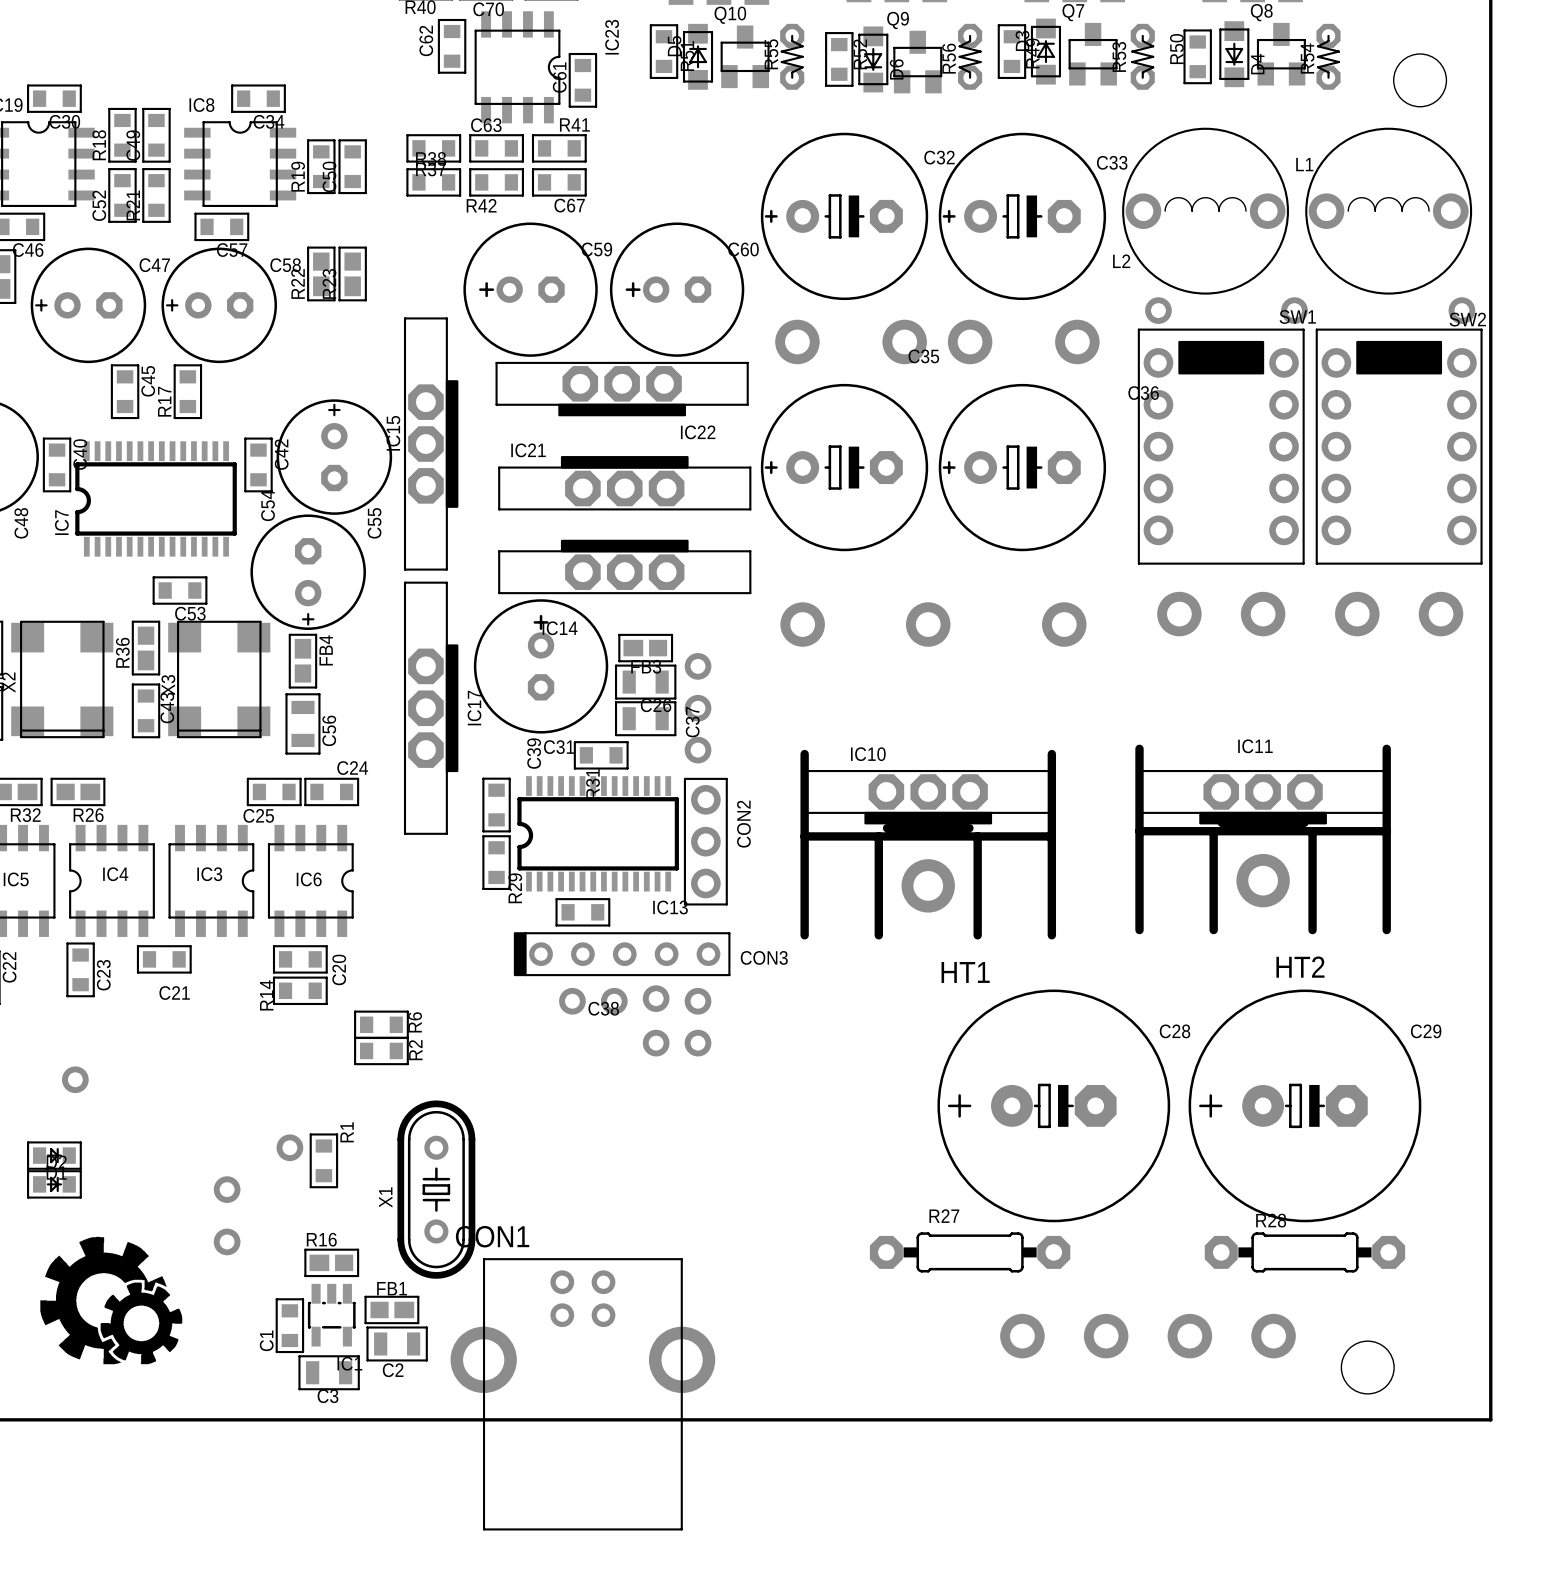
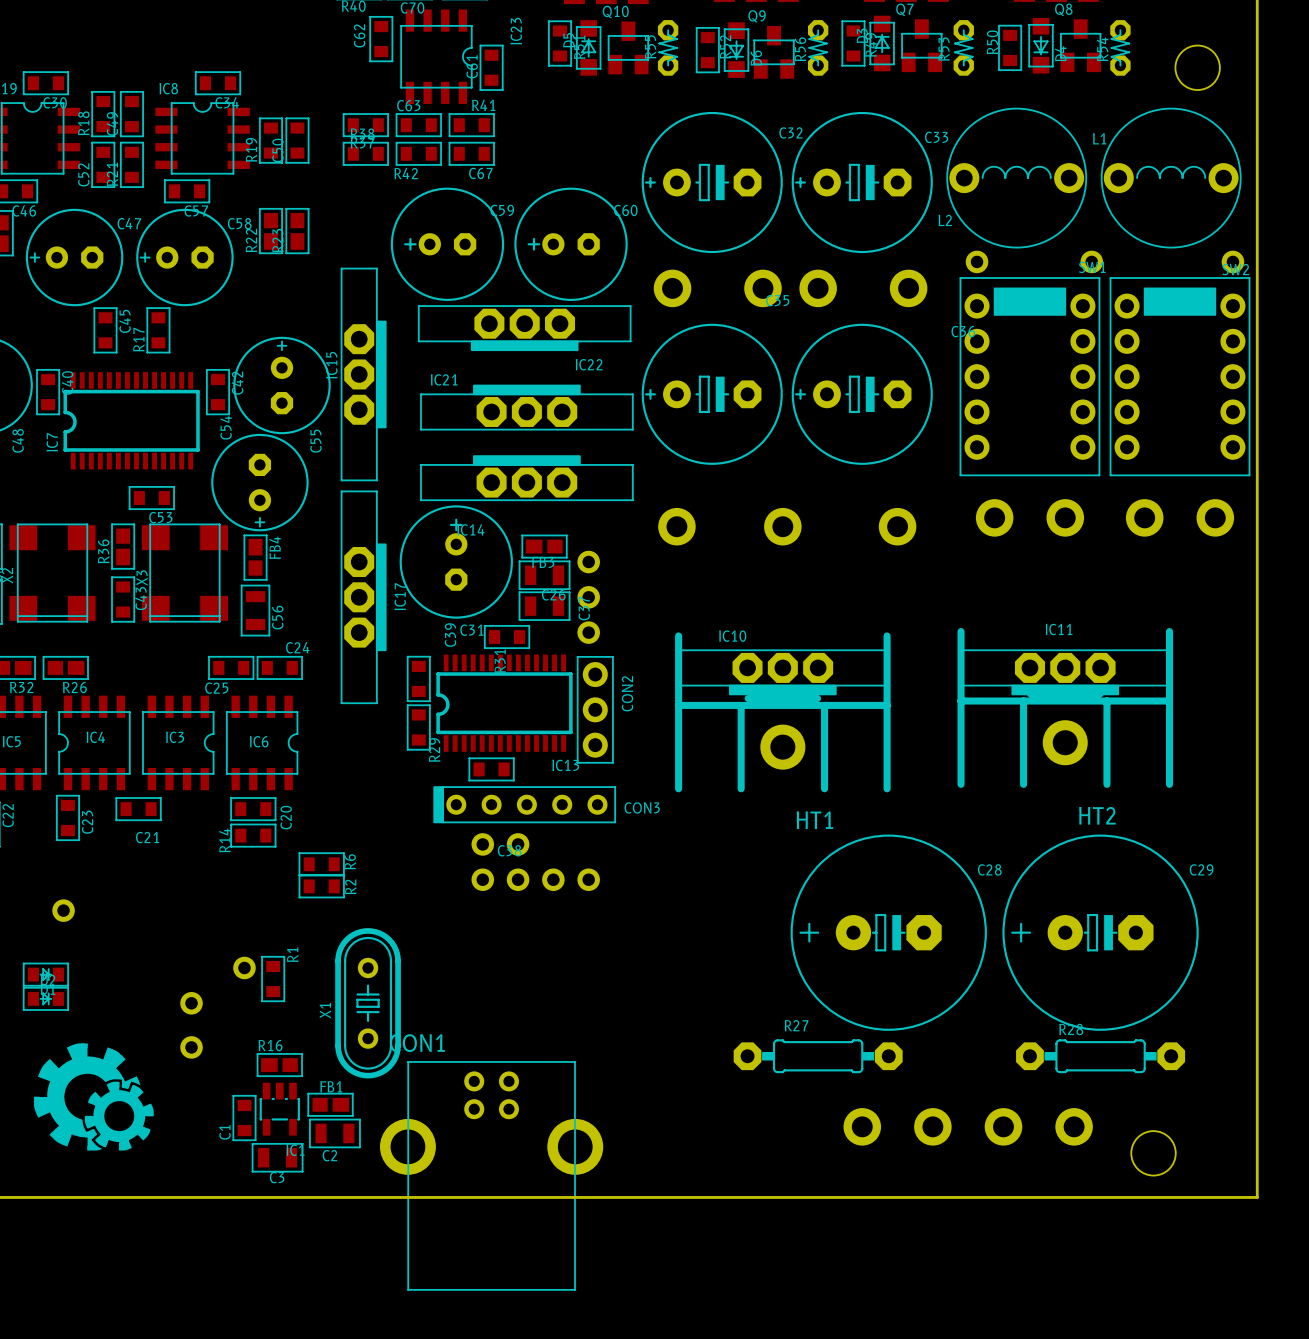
part: (656, 998) -> none
part: (698, 1001) -> none
part: none -> (482, 879)
part: none -> (518, 879)

